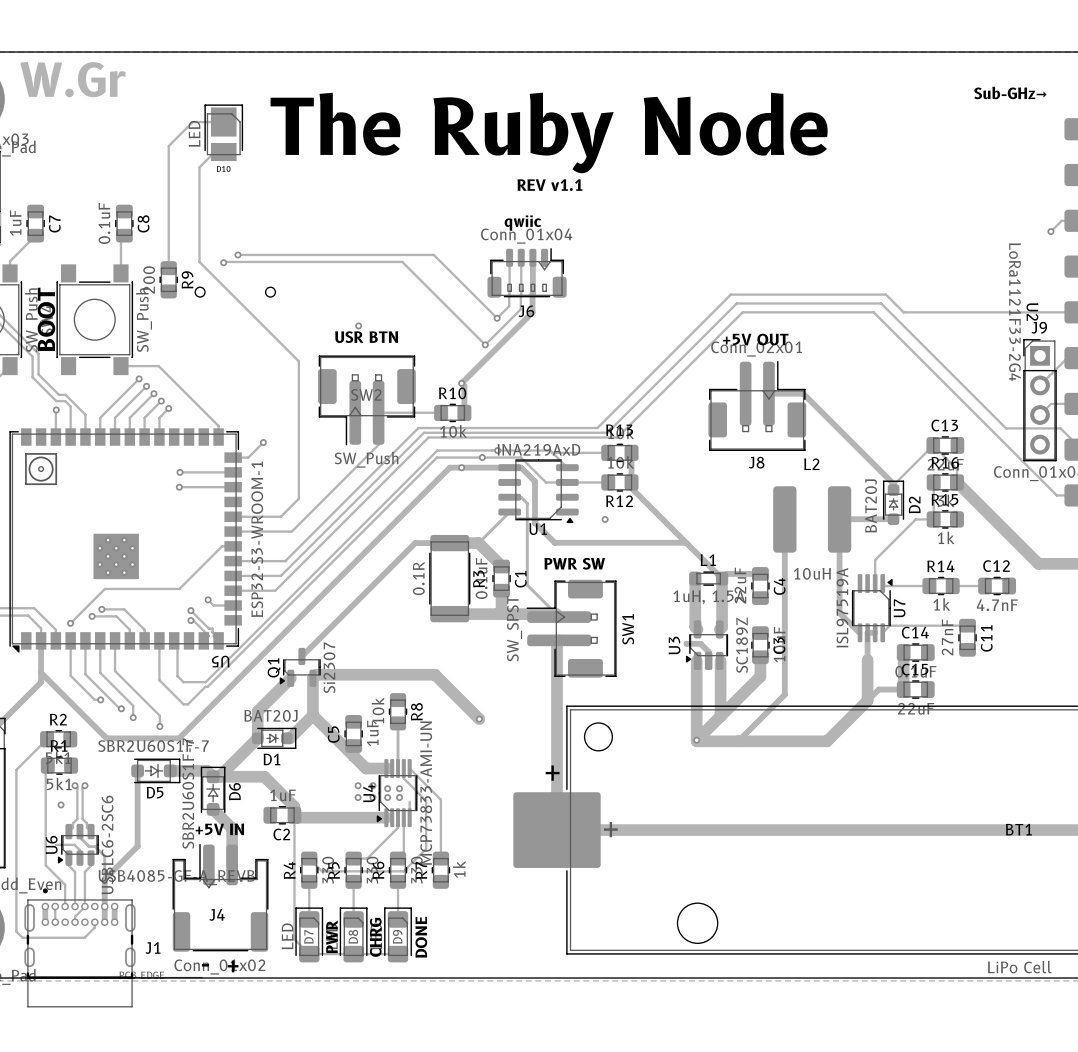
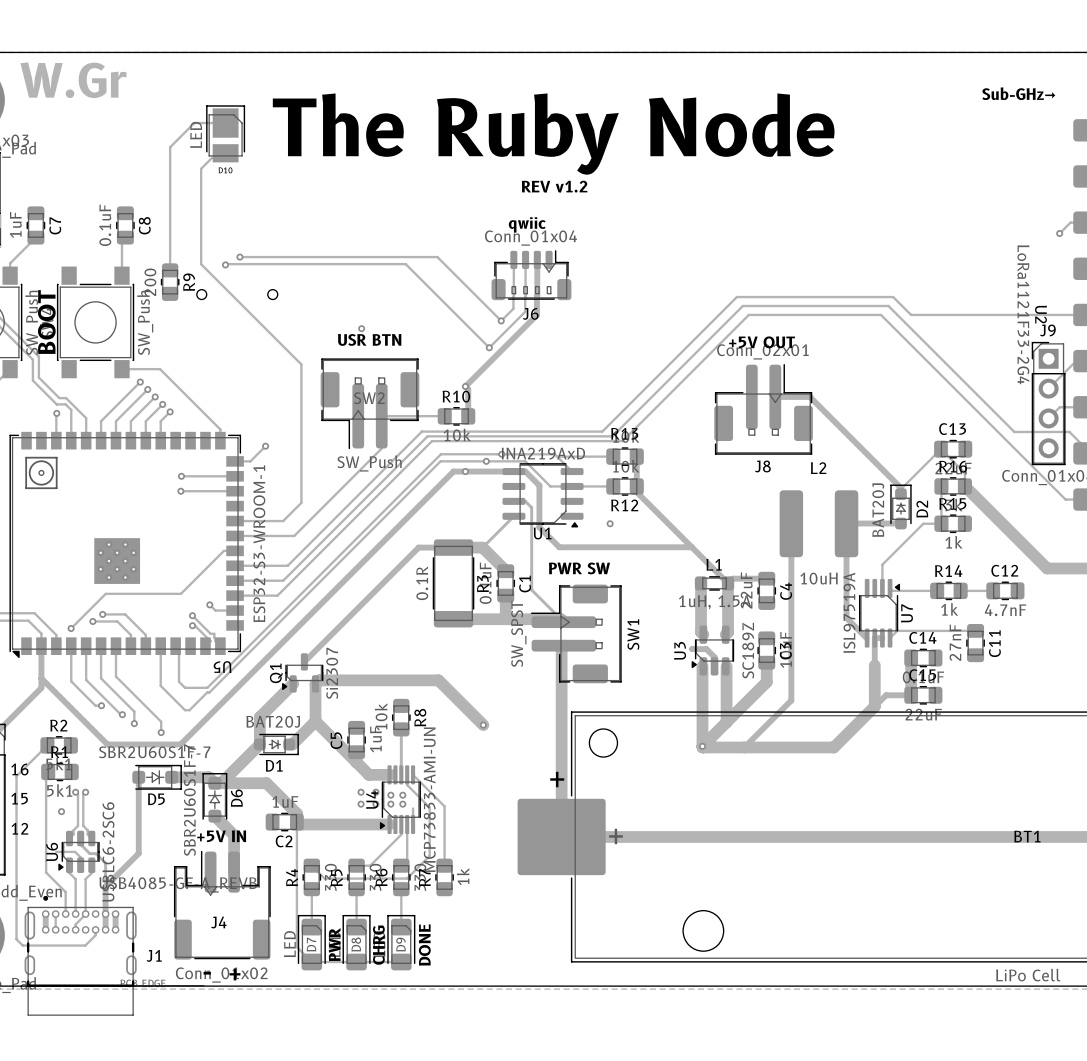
text: REV v1.1 (549, 185) -> REV v1.2 (554, 186)
text: none -> 16 (19, 769)
text: none -> 15 (19, 798)
text: none -> 12 (19, 828)

